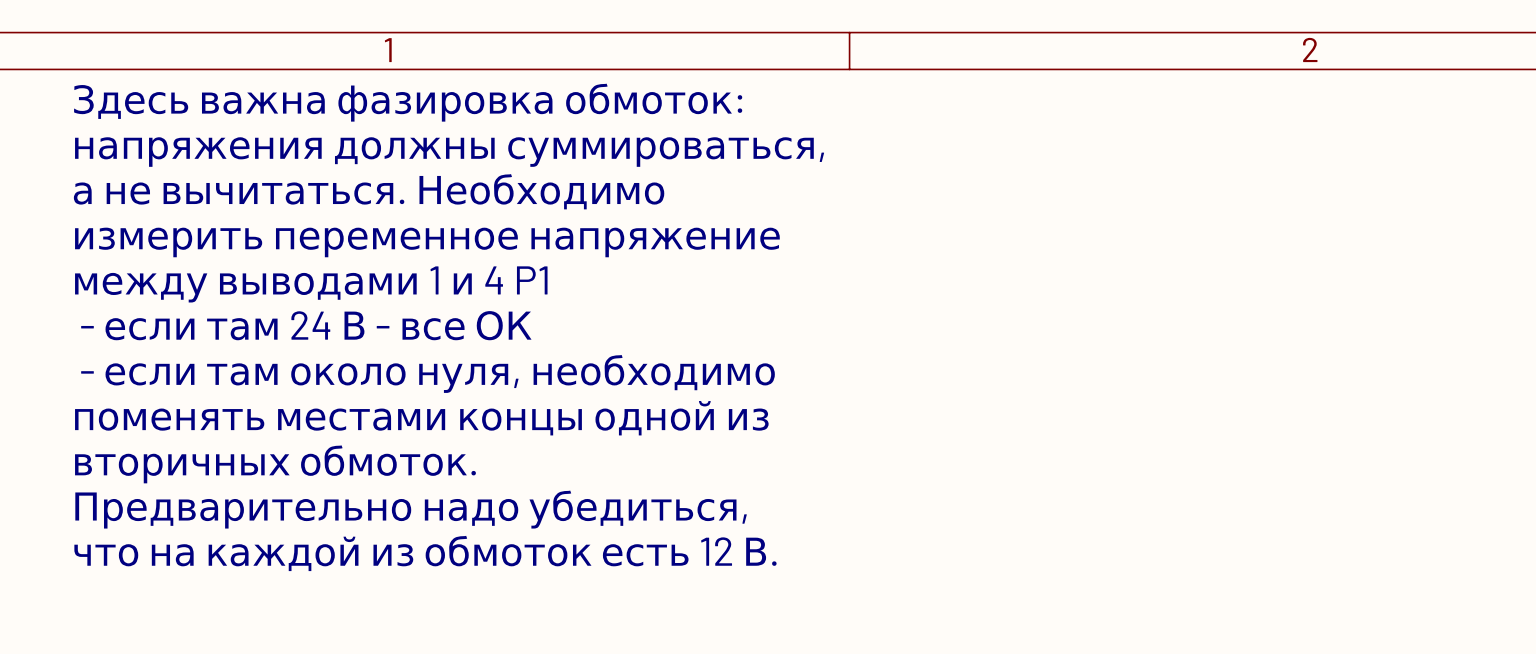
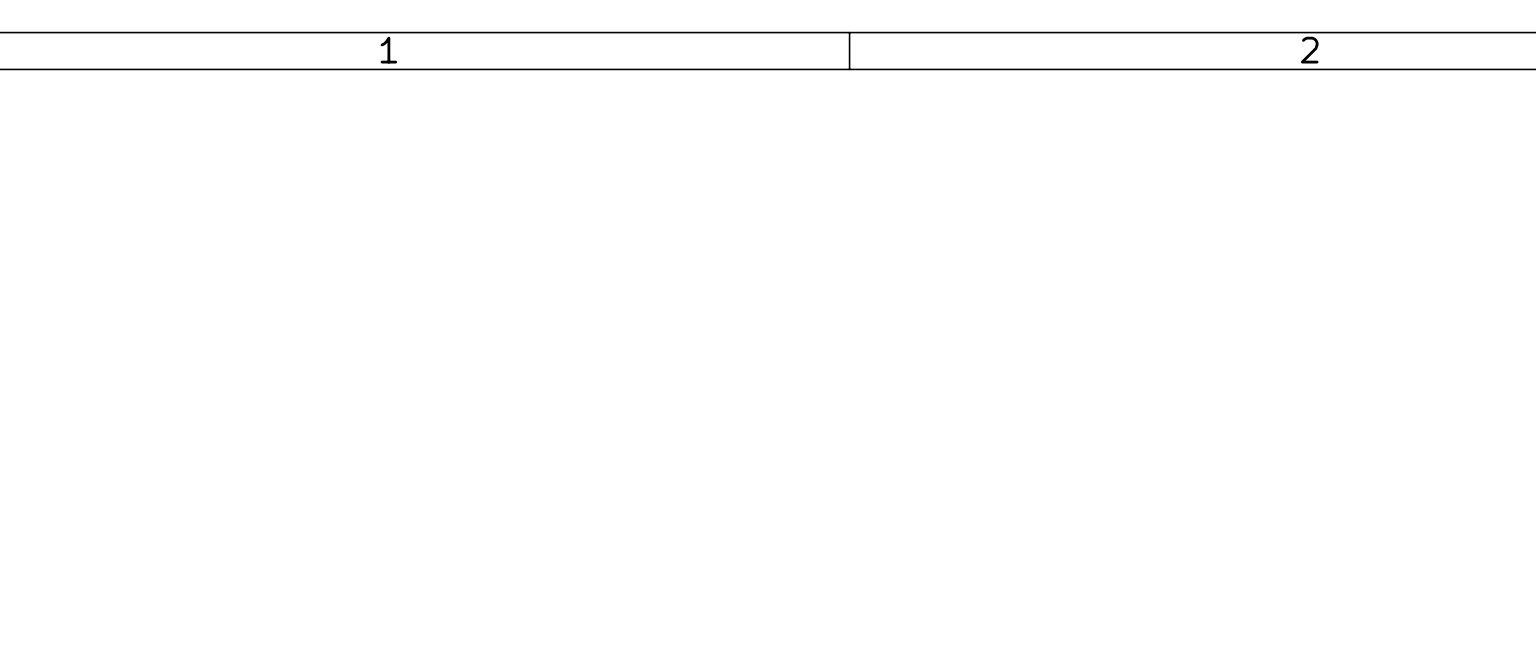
text: Здесь важна фазировка обмоток: (408, 102) -> none
text: напряжения должны суммироваться, (449, 152) -> none
text: а не вычитаться. Необходимо (369, 191) -> none
text: измерить переменное напряжение (427, 242) -> none
text: между выводами 1 и 4 P1 (311, 284) -> none
text: - если там 24 В - все ОК (306, 325) -> none
text: - если там около нуля, необходимо (428, 373) -> none
text: поменять местами концы одной из (421, 418) -> none
text: вторичных обмоток. (275, 464) -> none
text: Предварительно надо убедиться, (411, 509) -> none
text: что на каждой из обмоток есть 12 В. (425, 553) -> none

